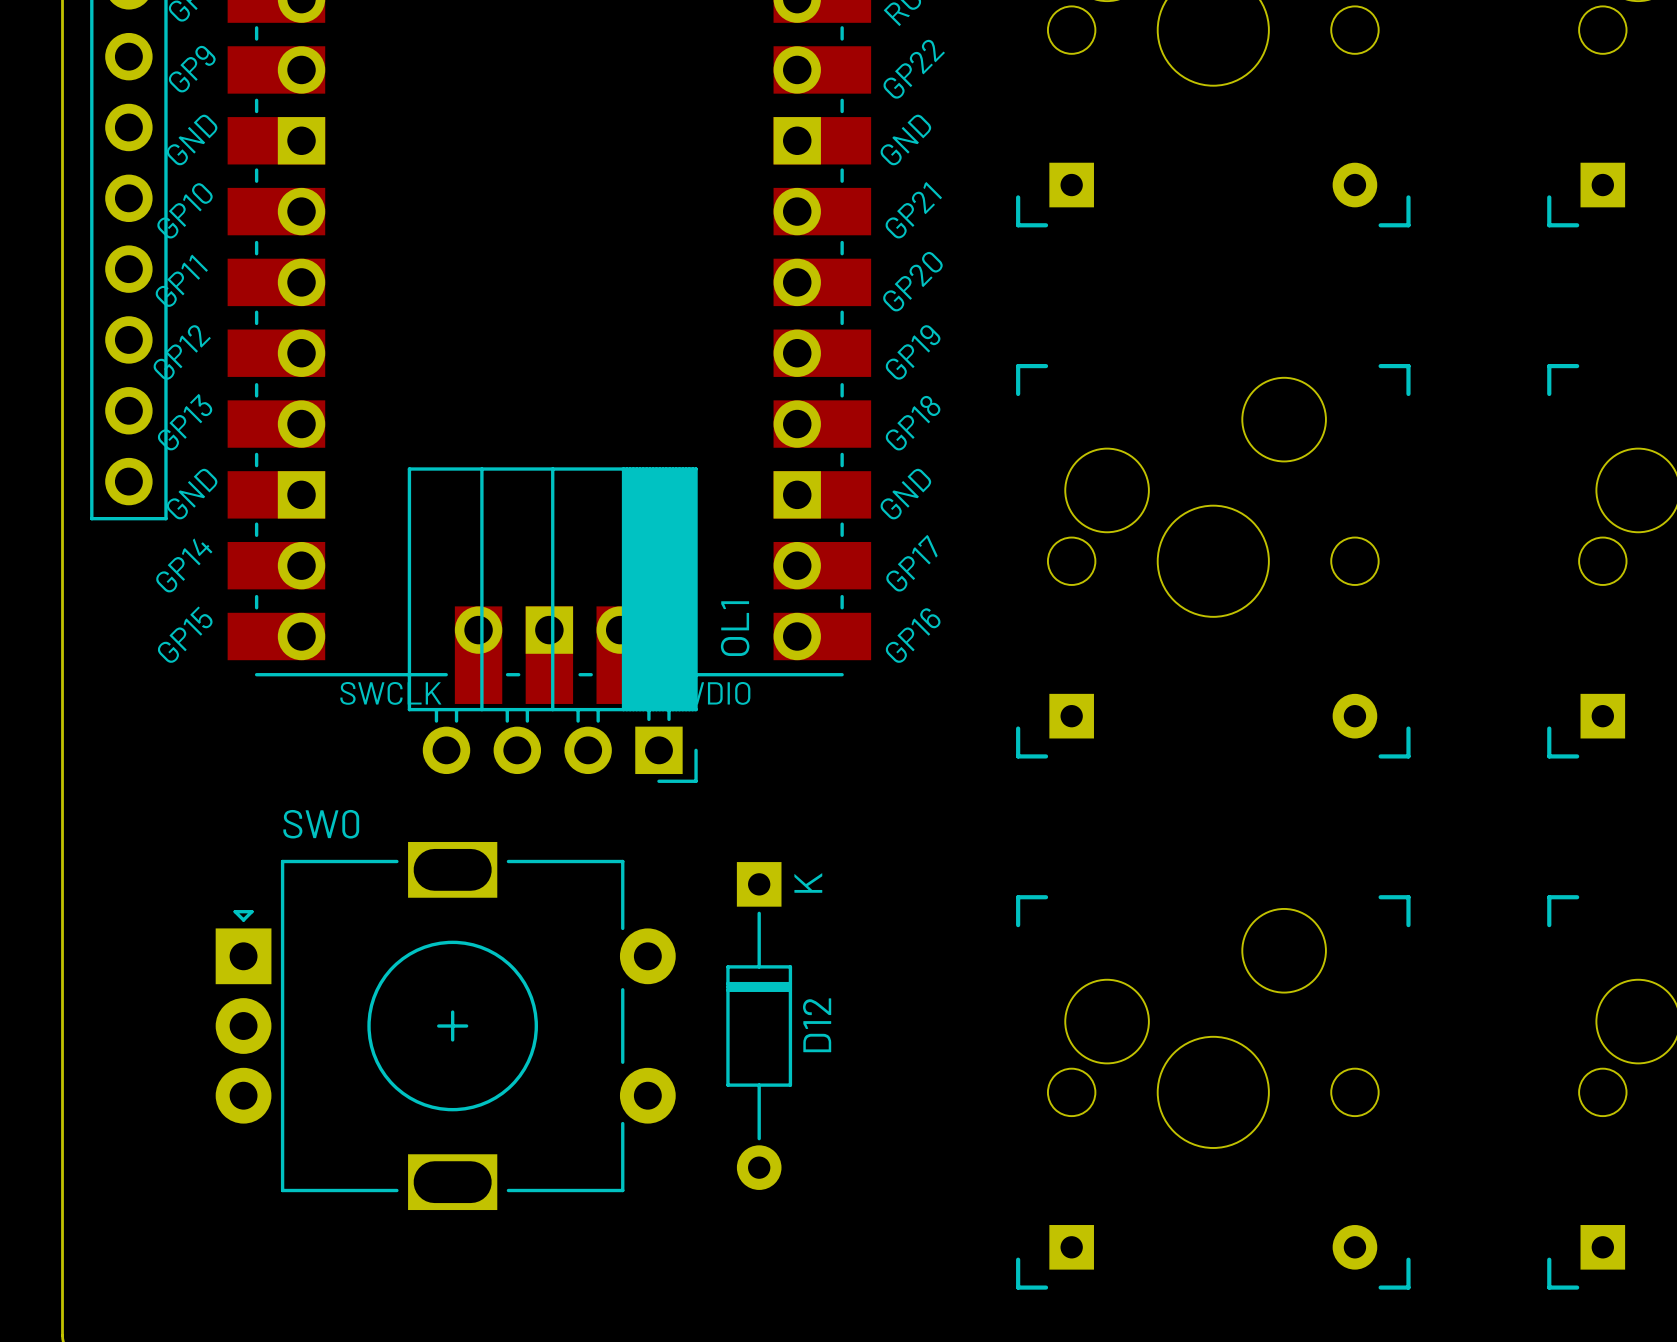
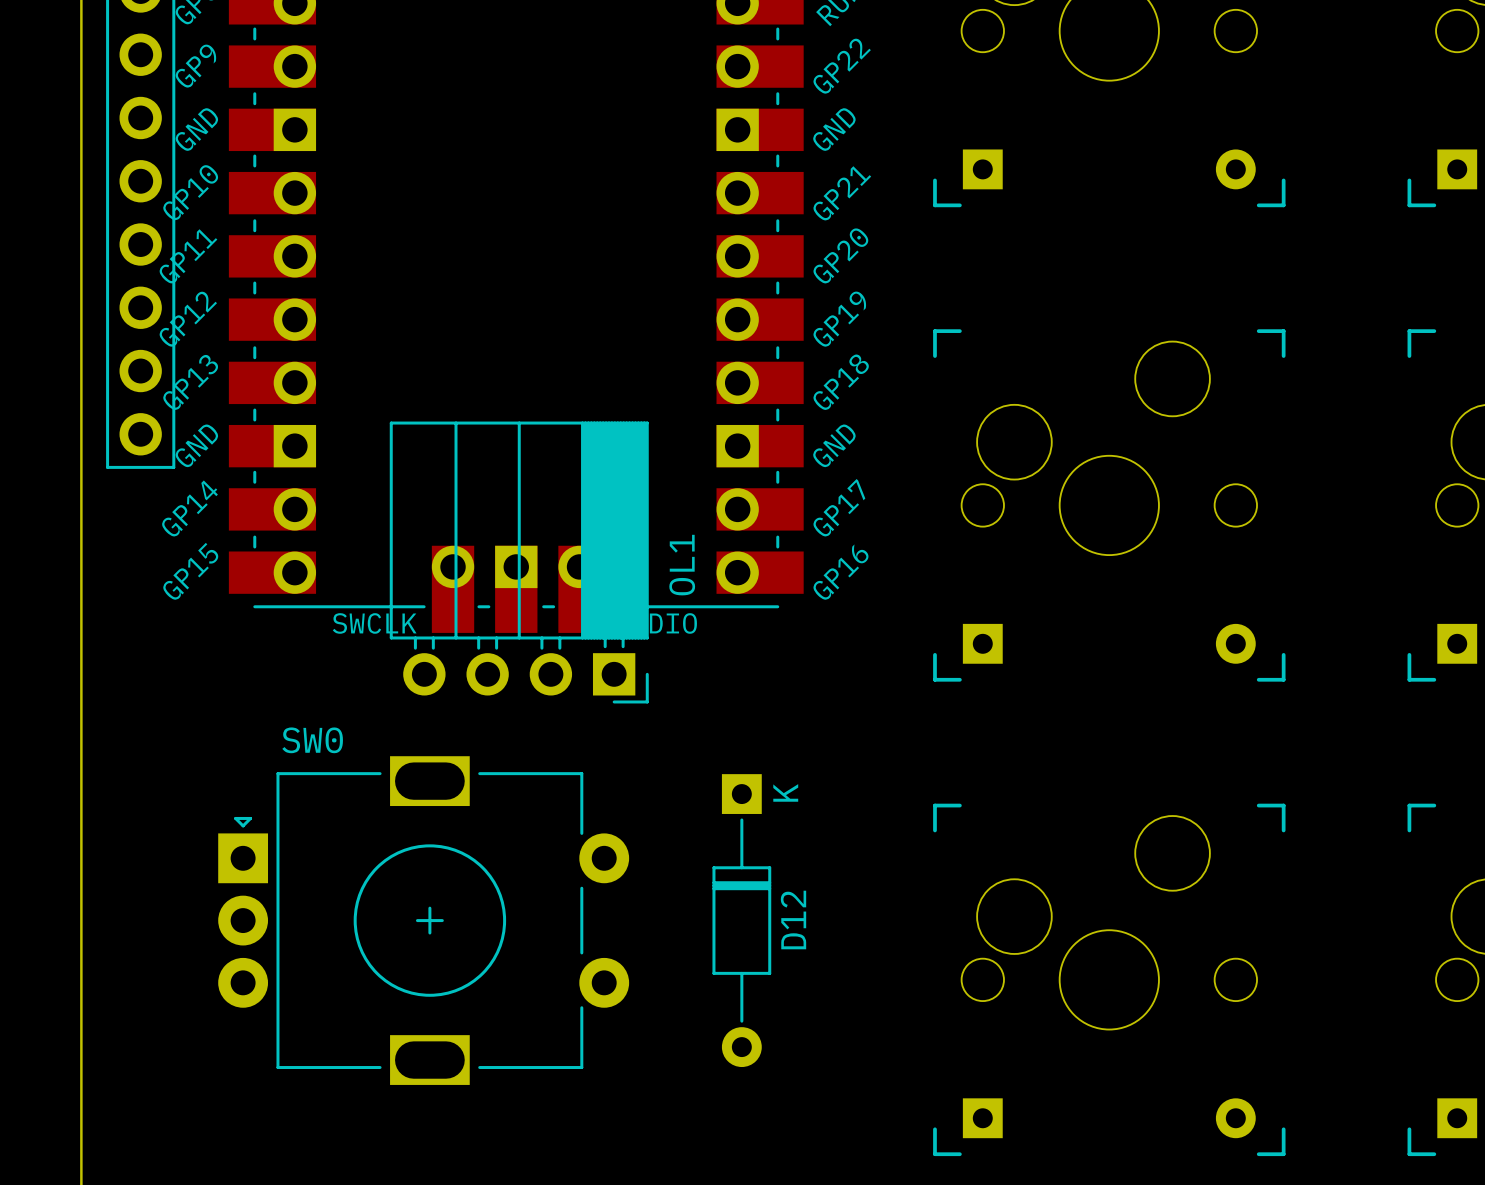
D12 position: (759, 1026) -> (741, 920)

